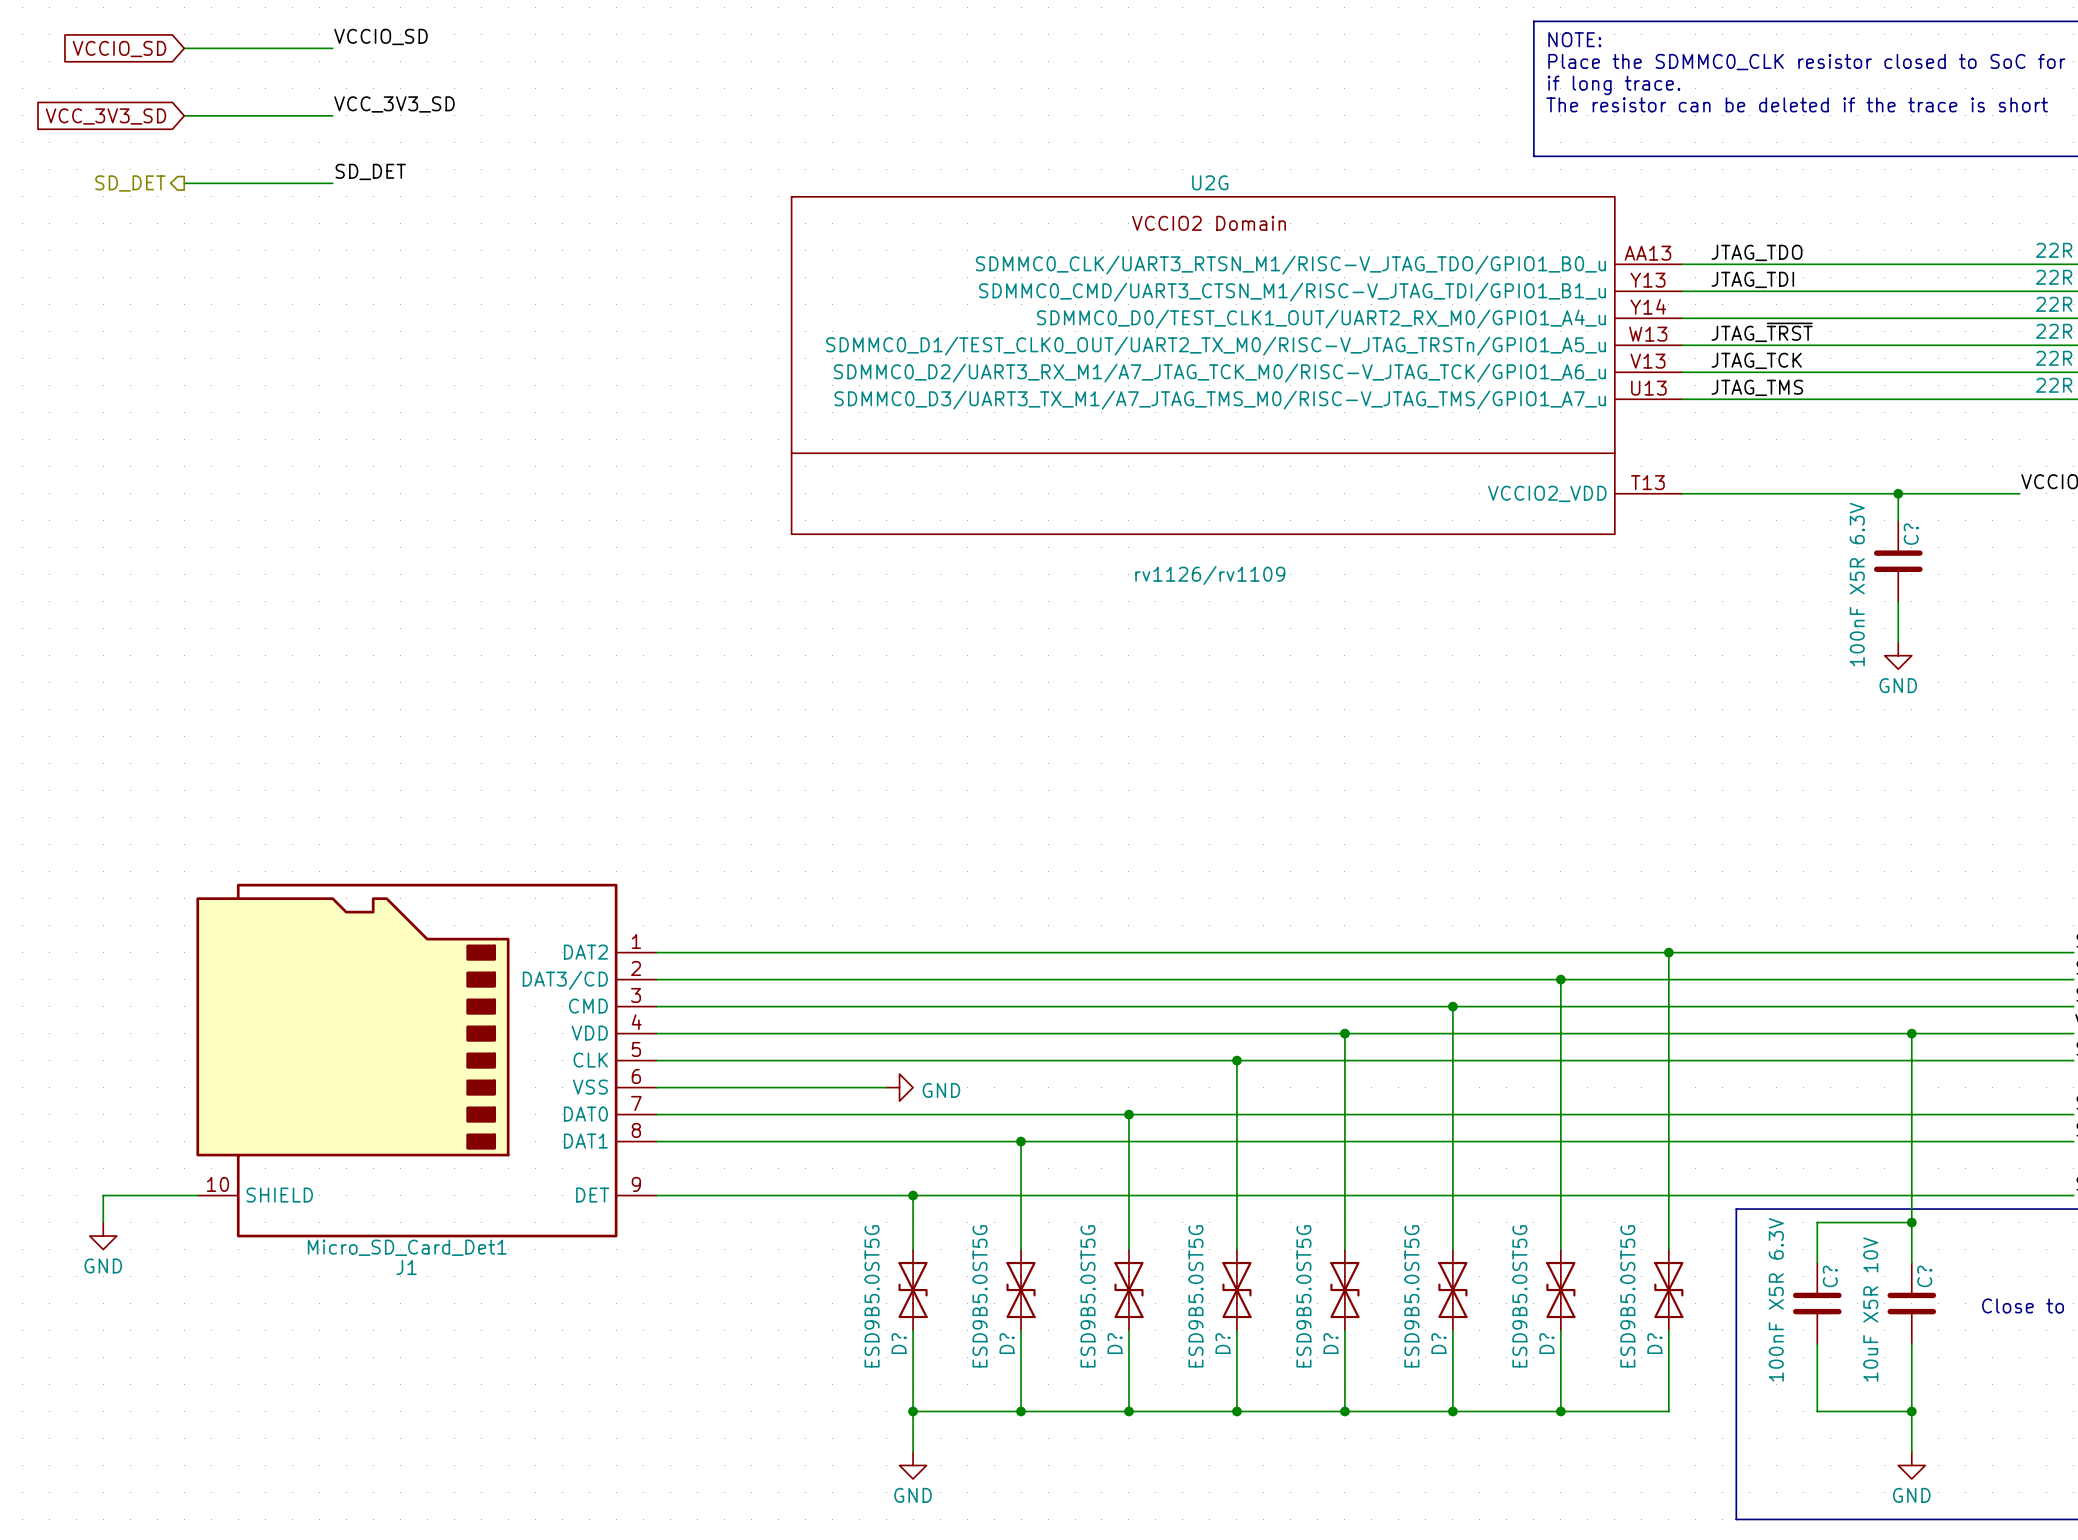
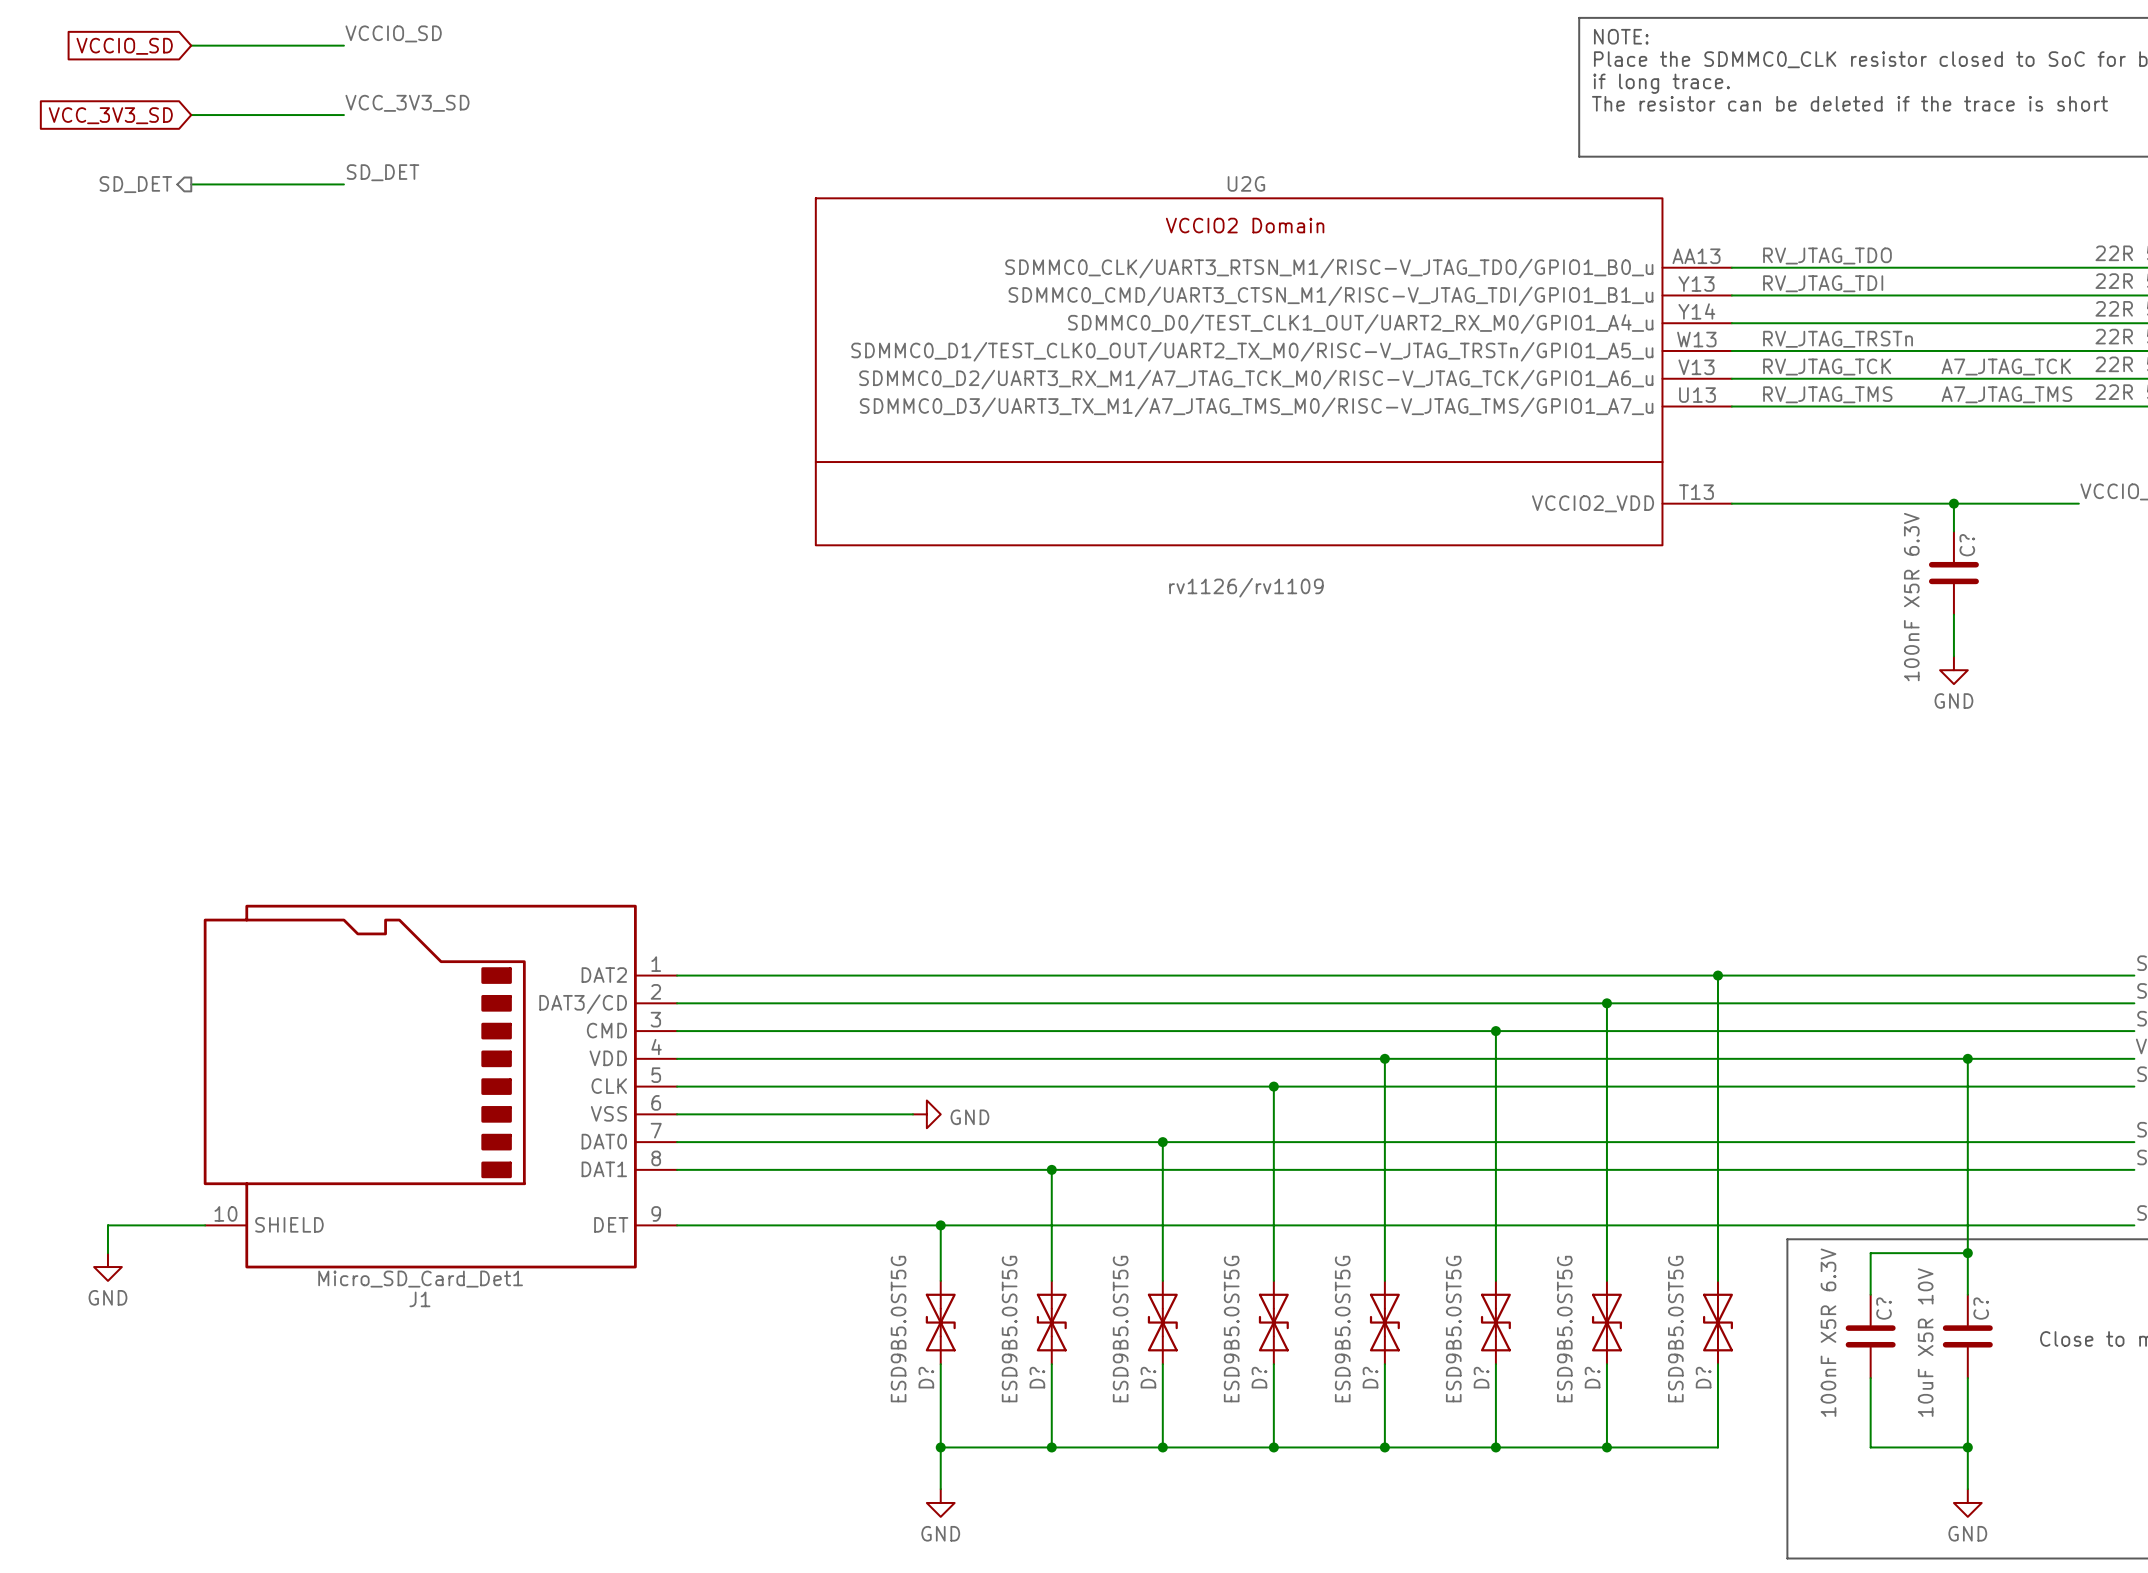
label: JTAG_TDO (1756, 252) -> RV_JTAG_TDO (1827, 255)
label: JTAG_TDI (1752, 279) -> RV_JTAG_TDI (1823, 283)
label: JTAG_~{TRST} (1762, 332) -> RV_JTAG_TRSTn (1838, 339)
label: JTAG_TCK (1756, 360) -> RV_JTAG_TCK (1827, 367)
label: none -> A7_JTAG_TCK (2006, 367)
label: JTAG_TMS (1757, 387) -> RV_JTAG_TMS (1827, 394)
label: none -> A7_JTAG_TMS (2006, 394)

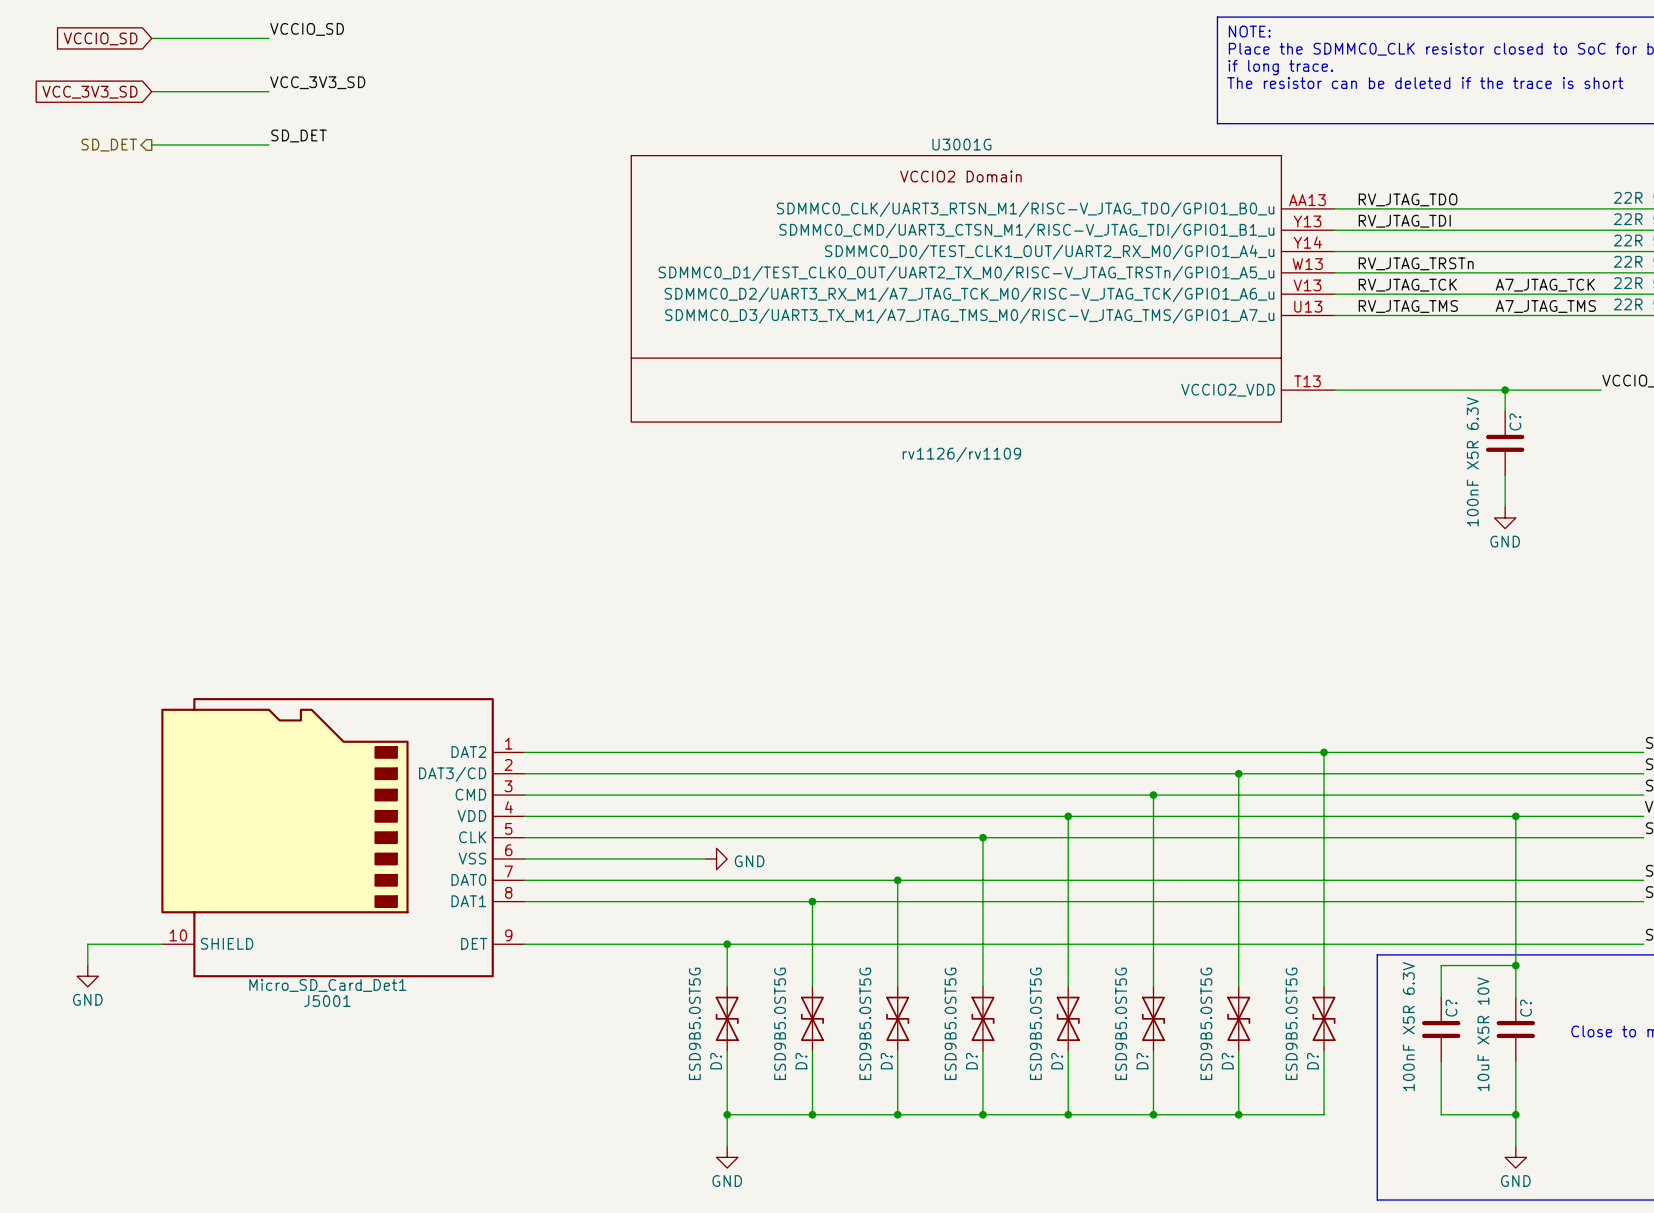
U2G name: U2G (1246, 183) -> U3001G (961, 144)
J1 name: J1 (419, 1299) -> J5001 (327, 1001)

